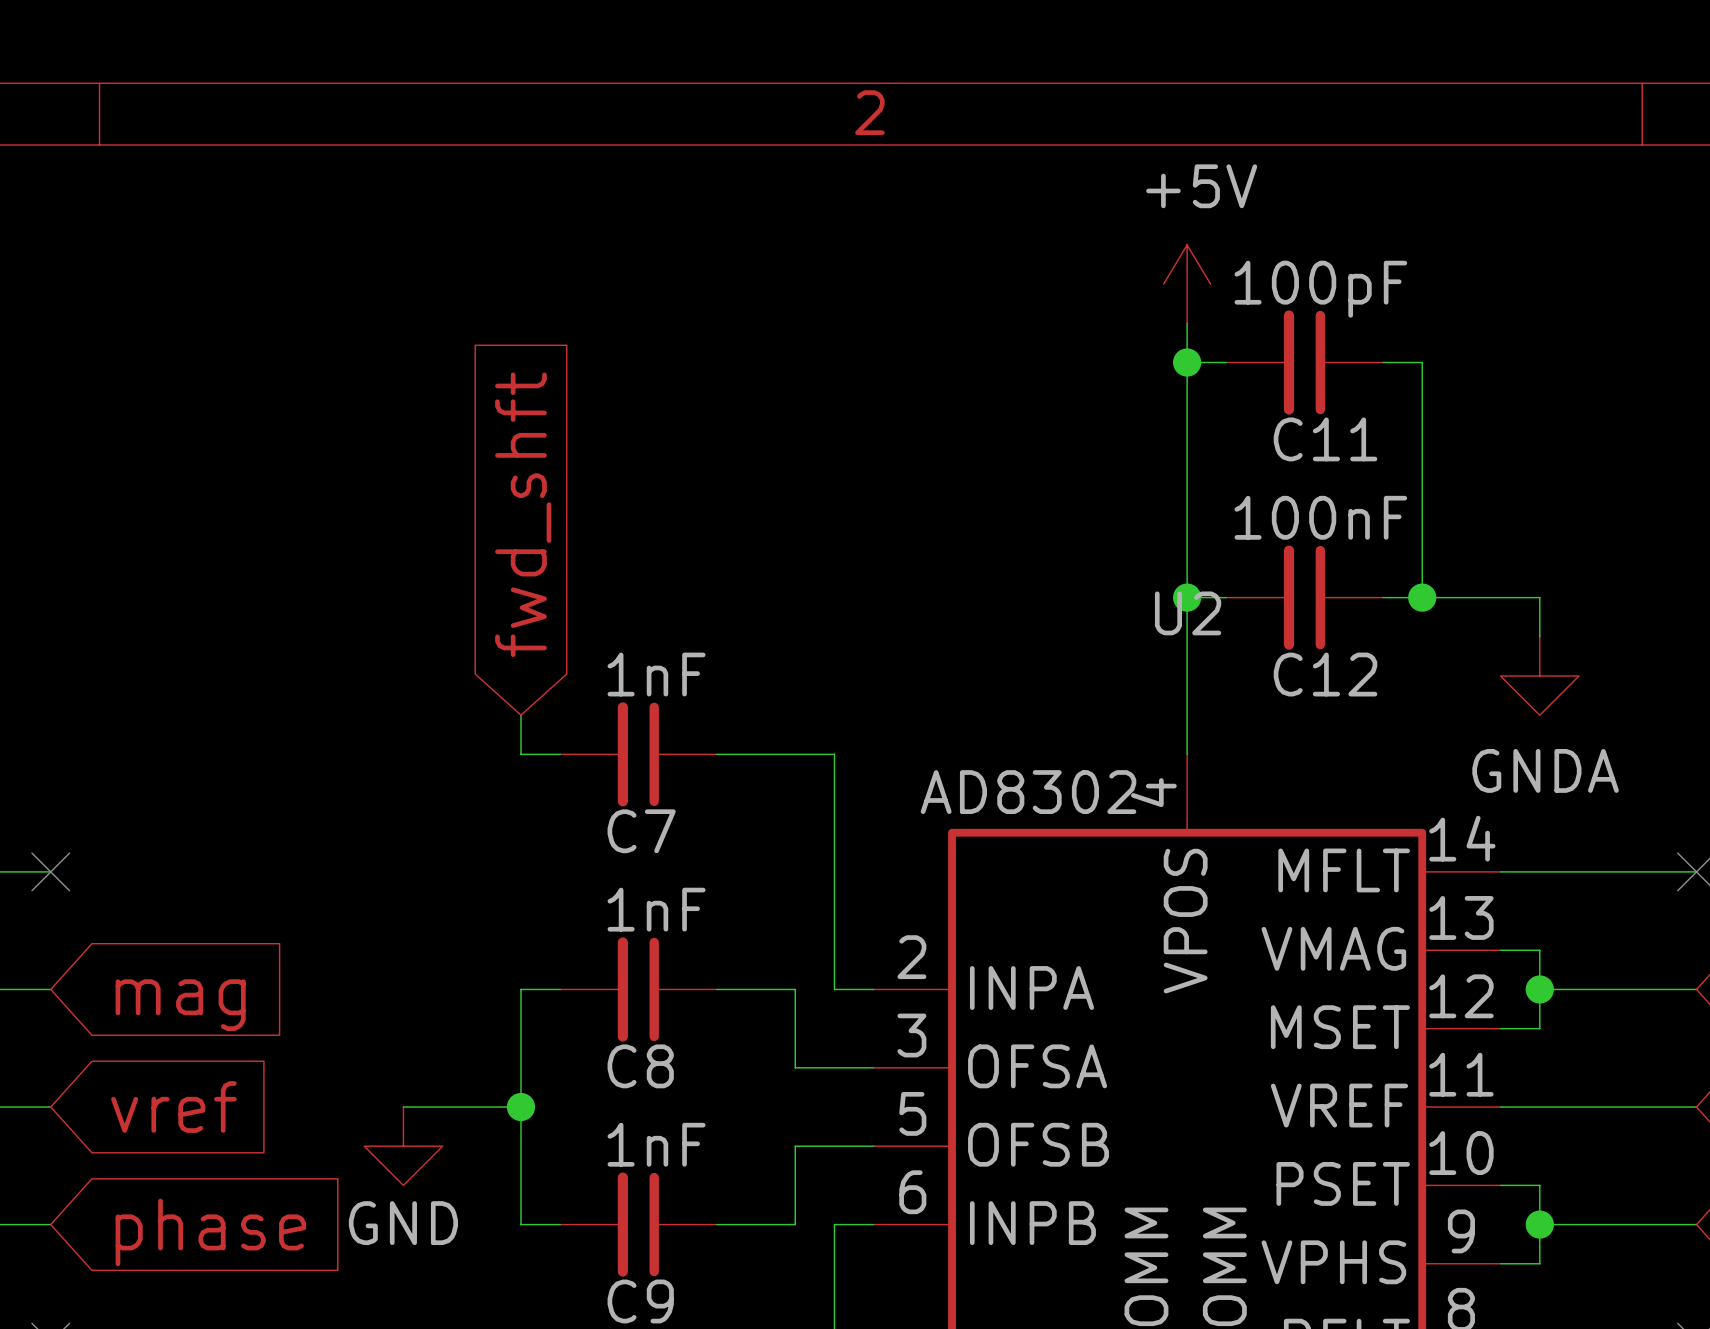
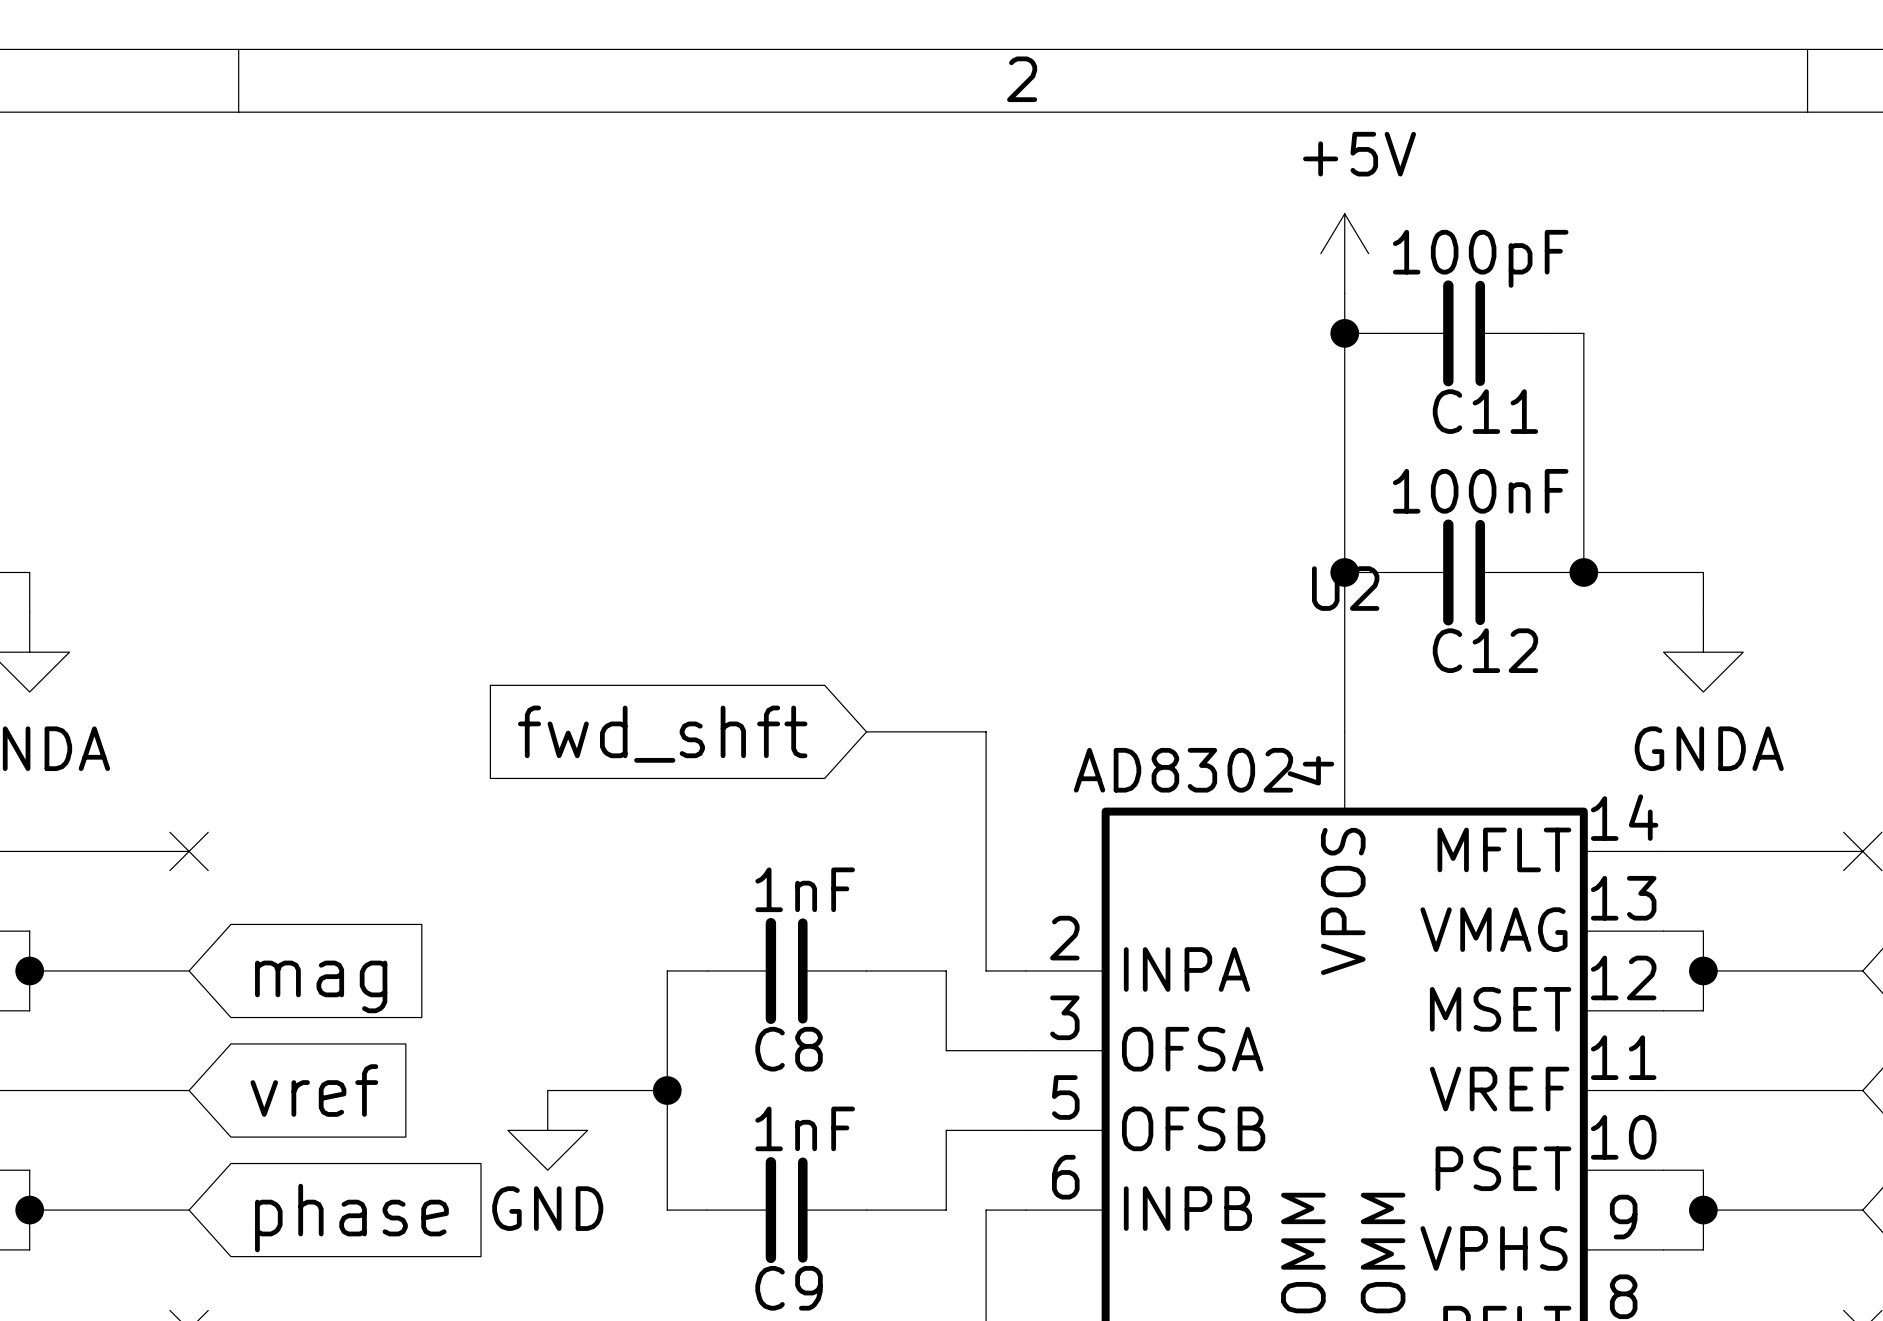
global label rotation: 0° (523, 514) -> 90° counterclockwise (662, 734)
wire: (520, 715) (520, 754) (560, 754) -> none
C7: 1nF (638, 754) -> none

